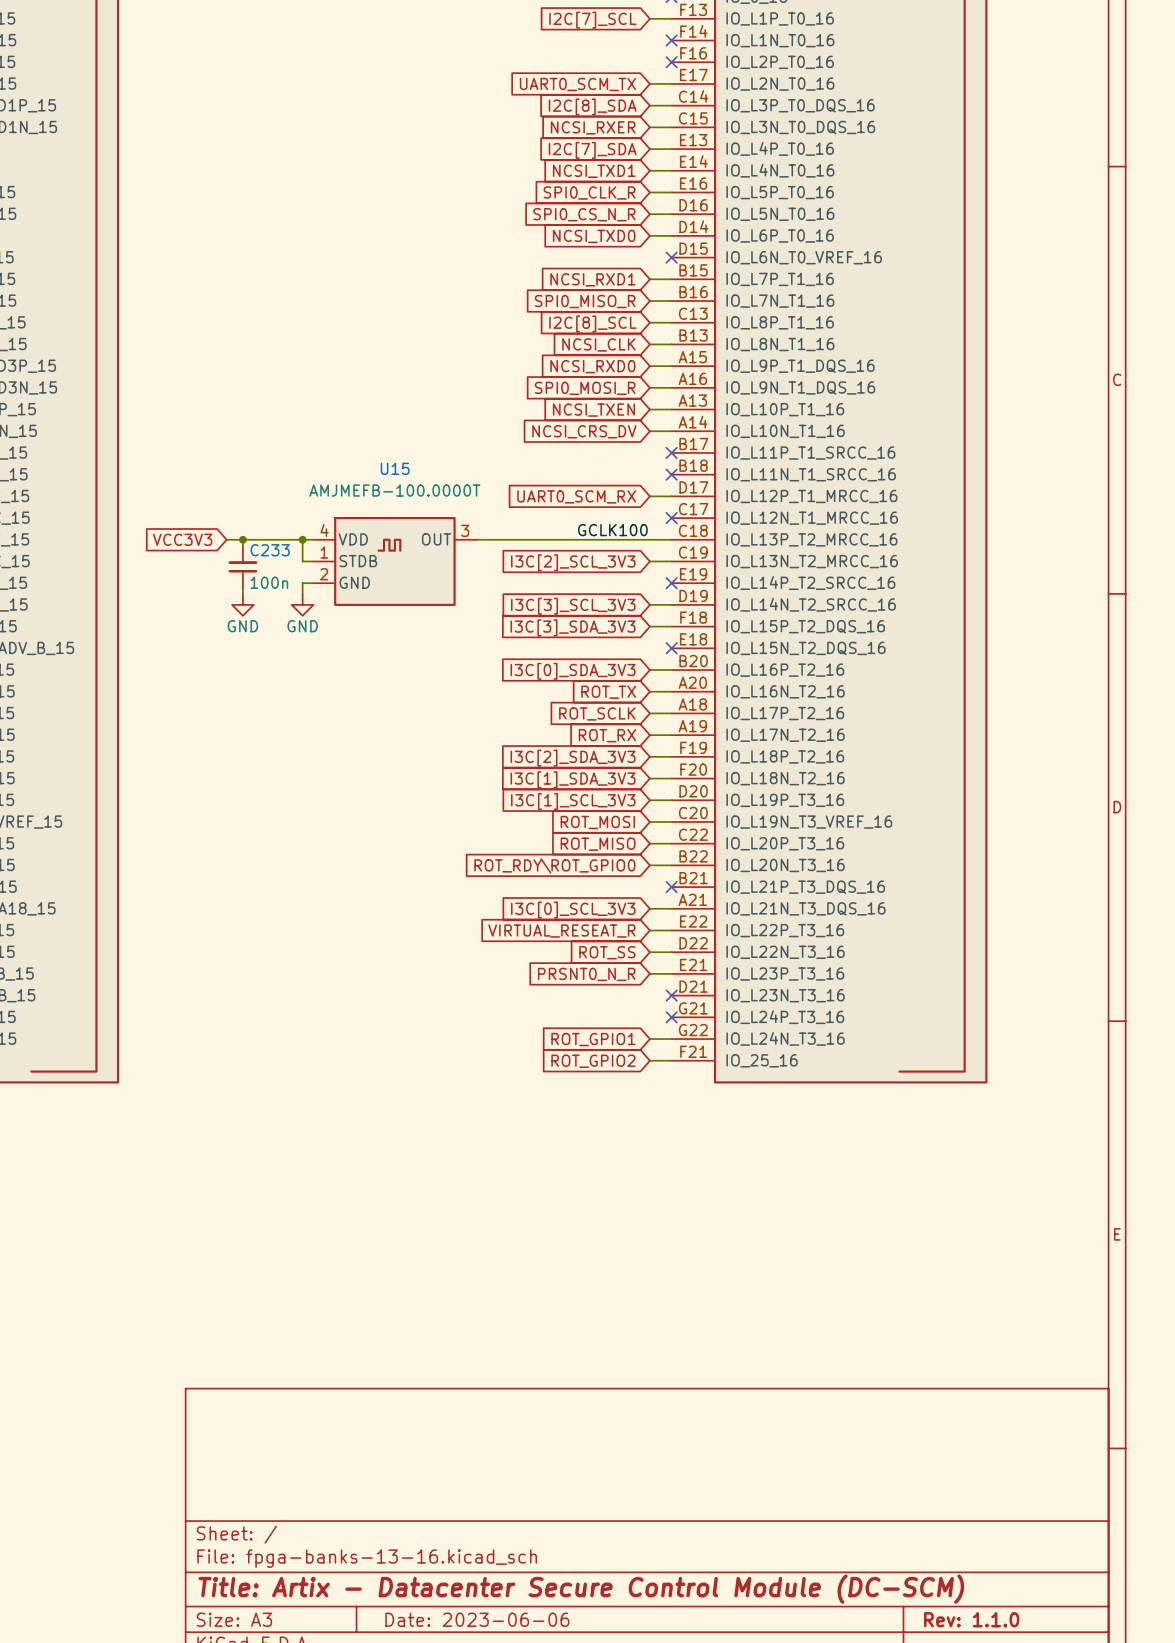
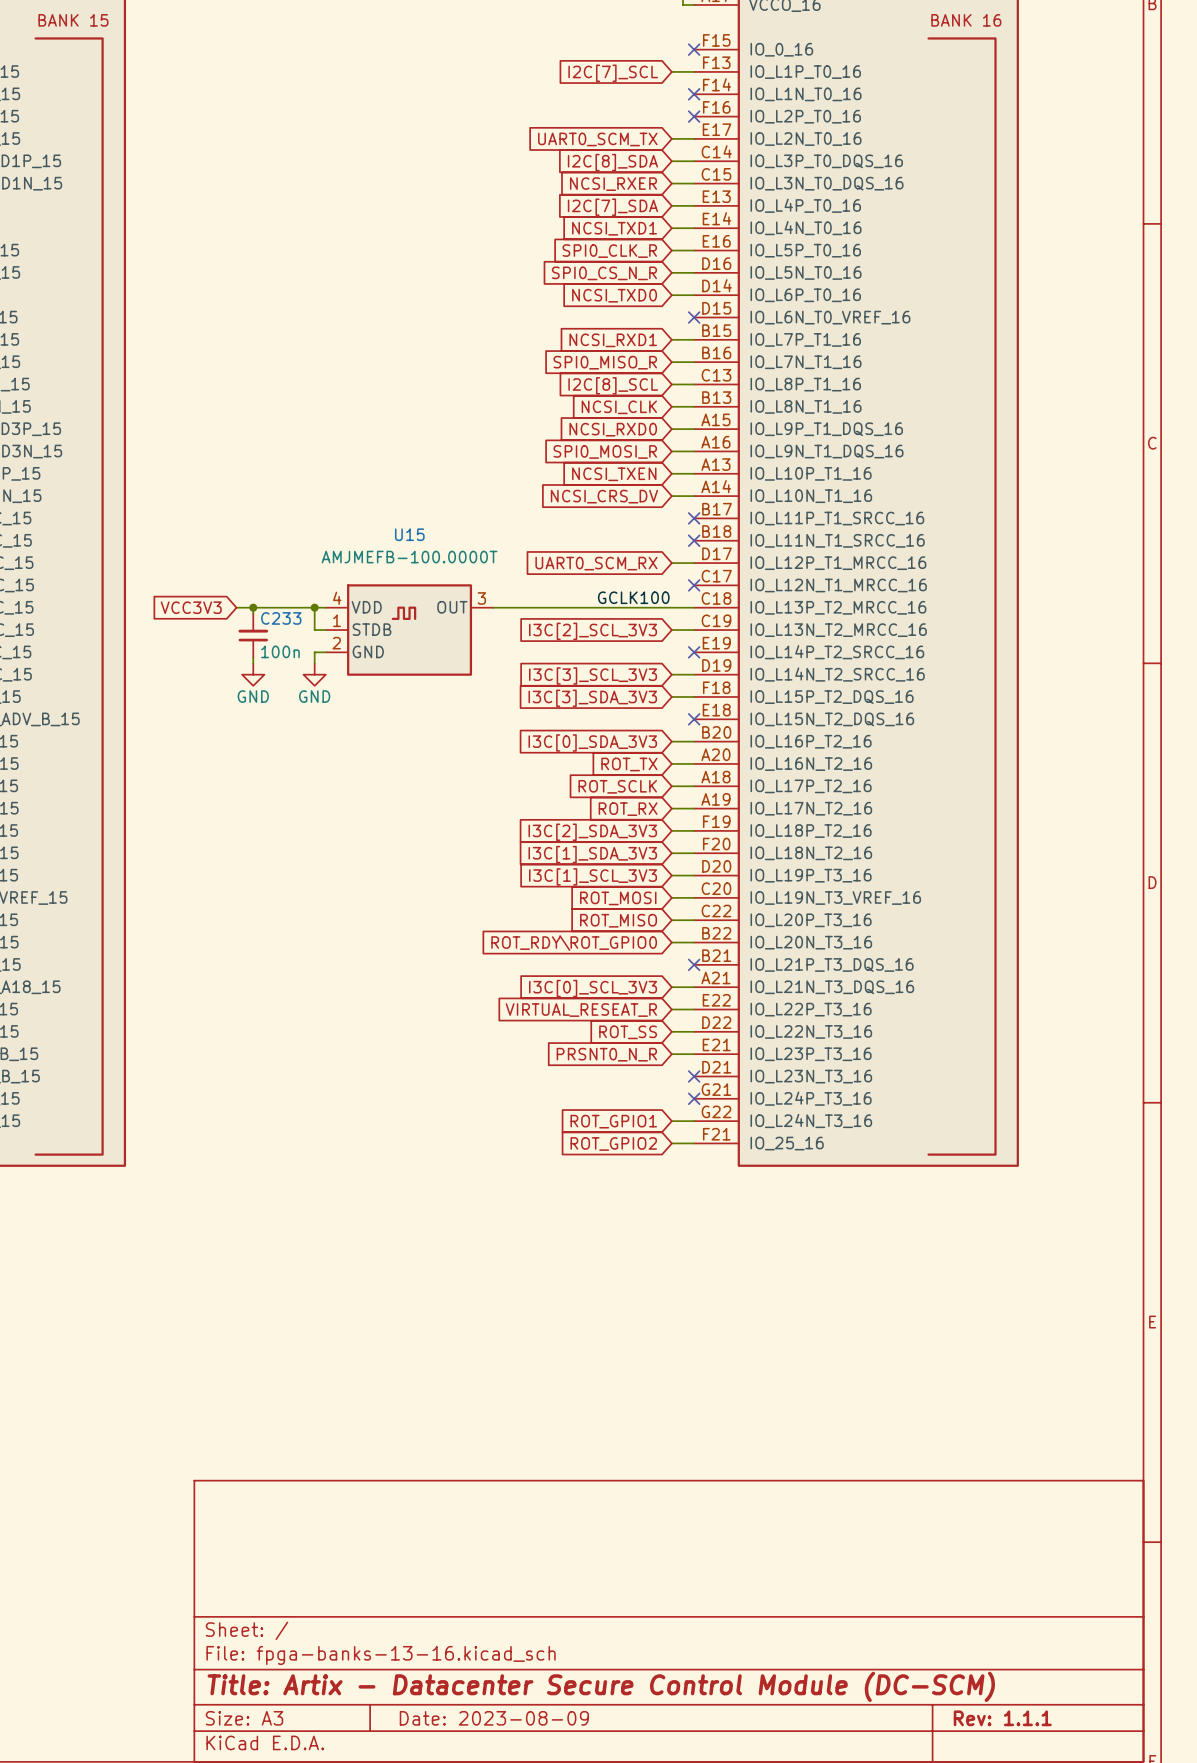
title block: Date: 2023-06-06 (477, 1619) -> Date: 2023-08-09 (494, 1718)
title block: Rev: 1.1.0 (971, 1619) -> Rev: 1.1.1 (1002, 1718)

